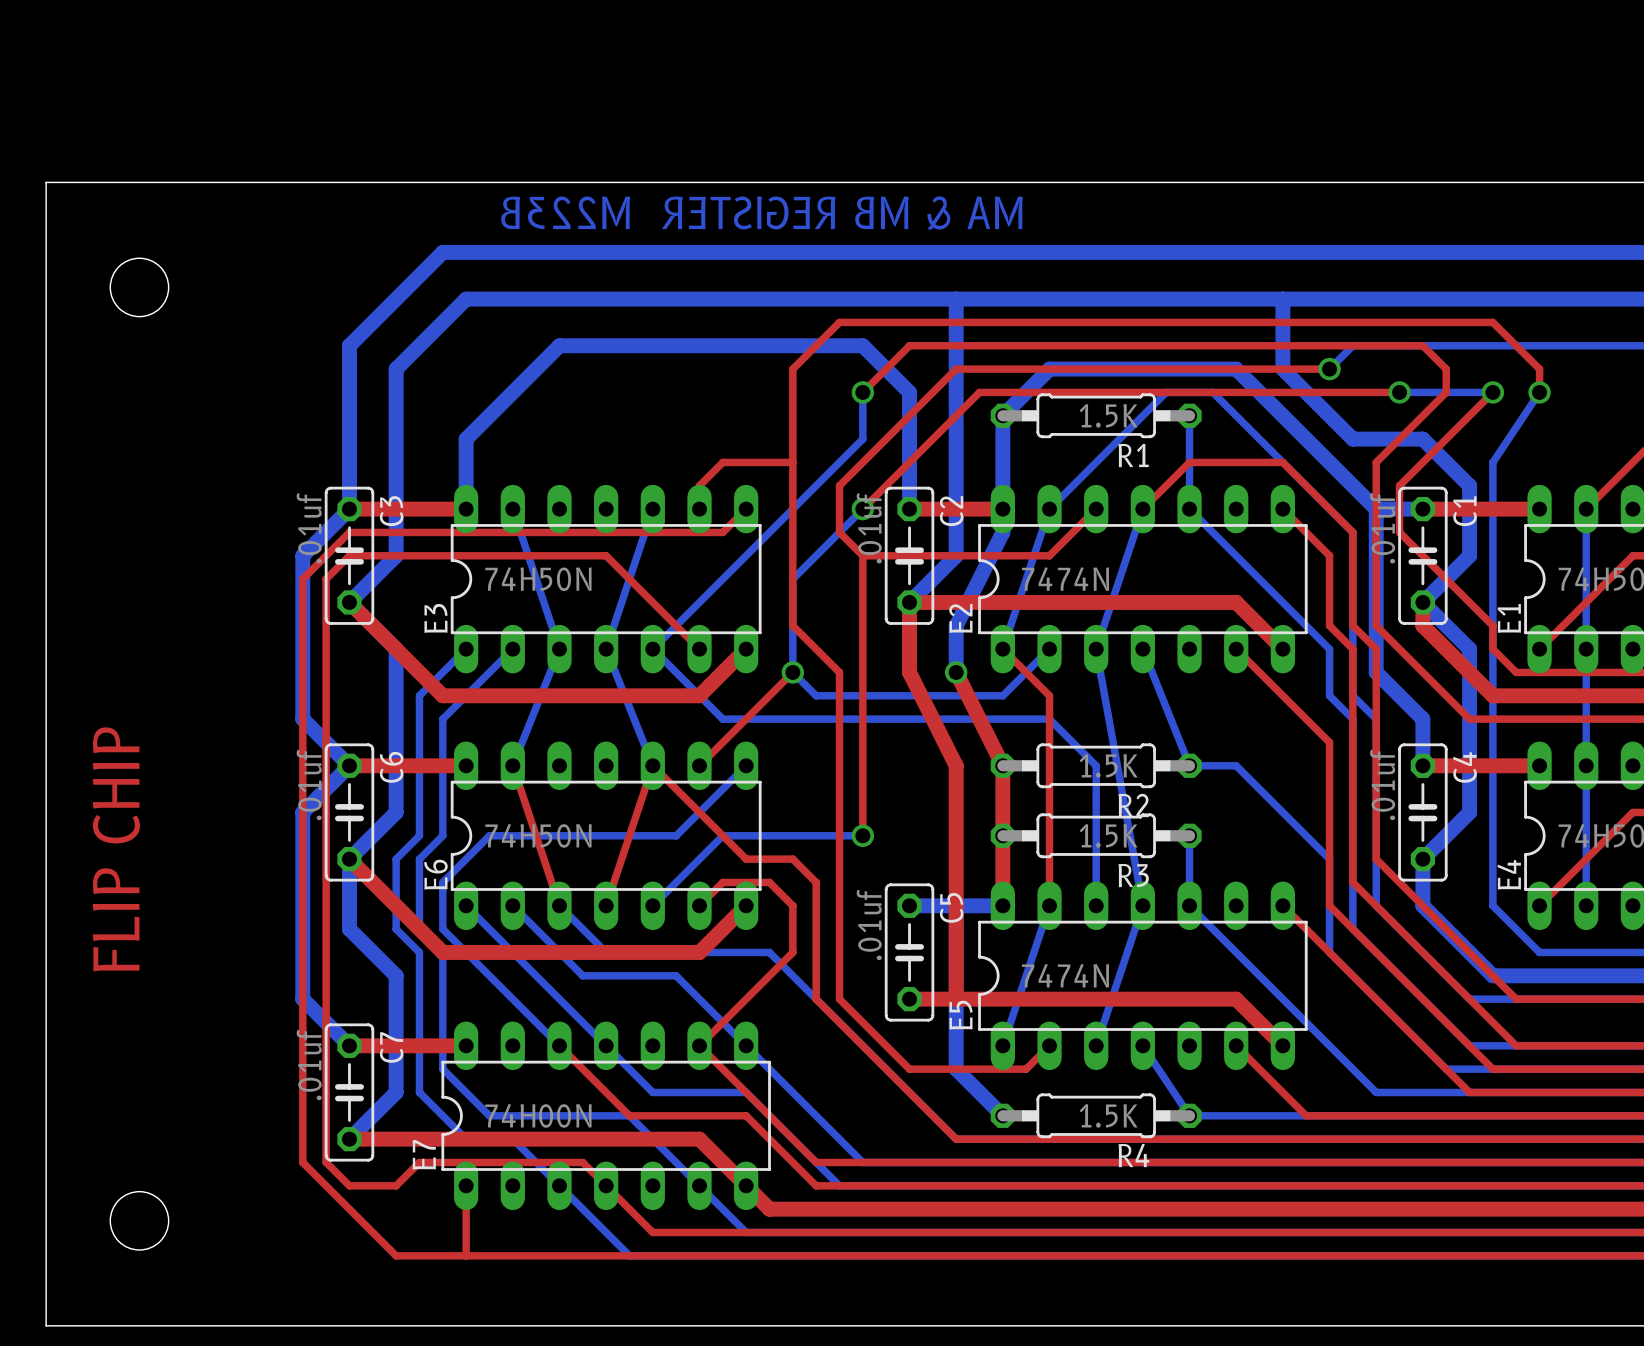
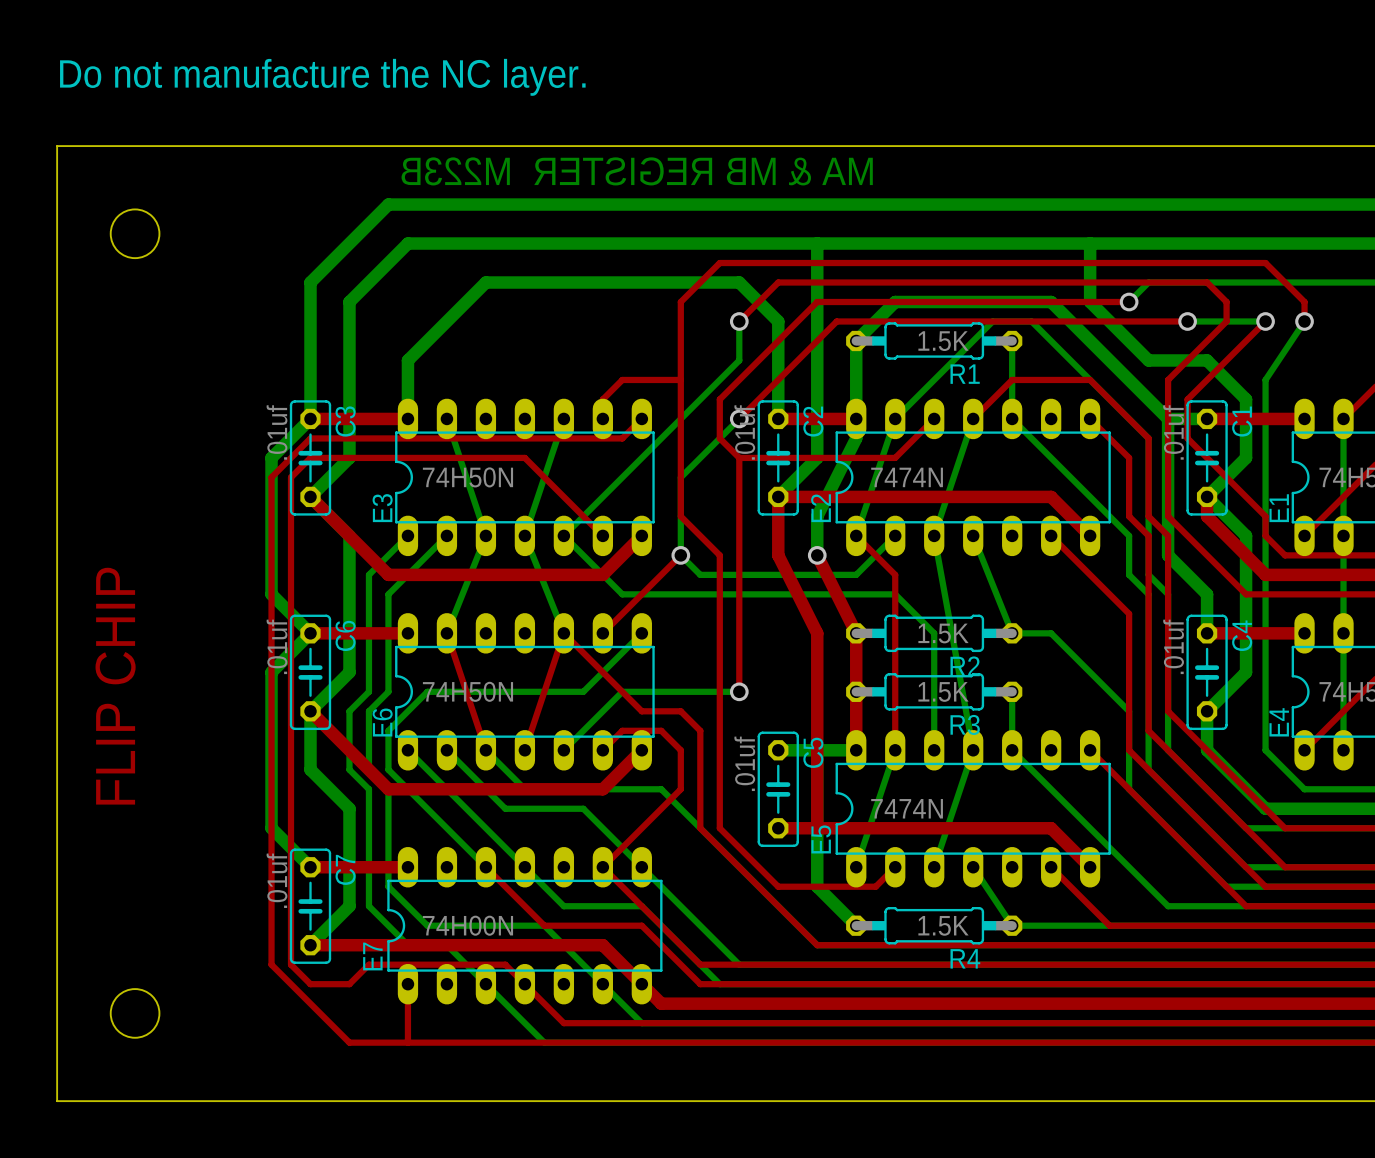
text: none -> Do not manufacture the NC layer. (322, 77)

